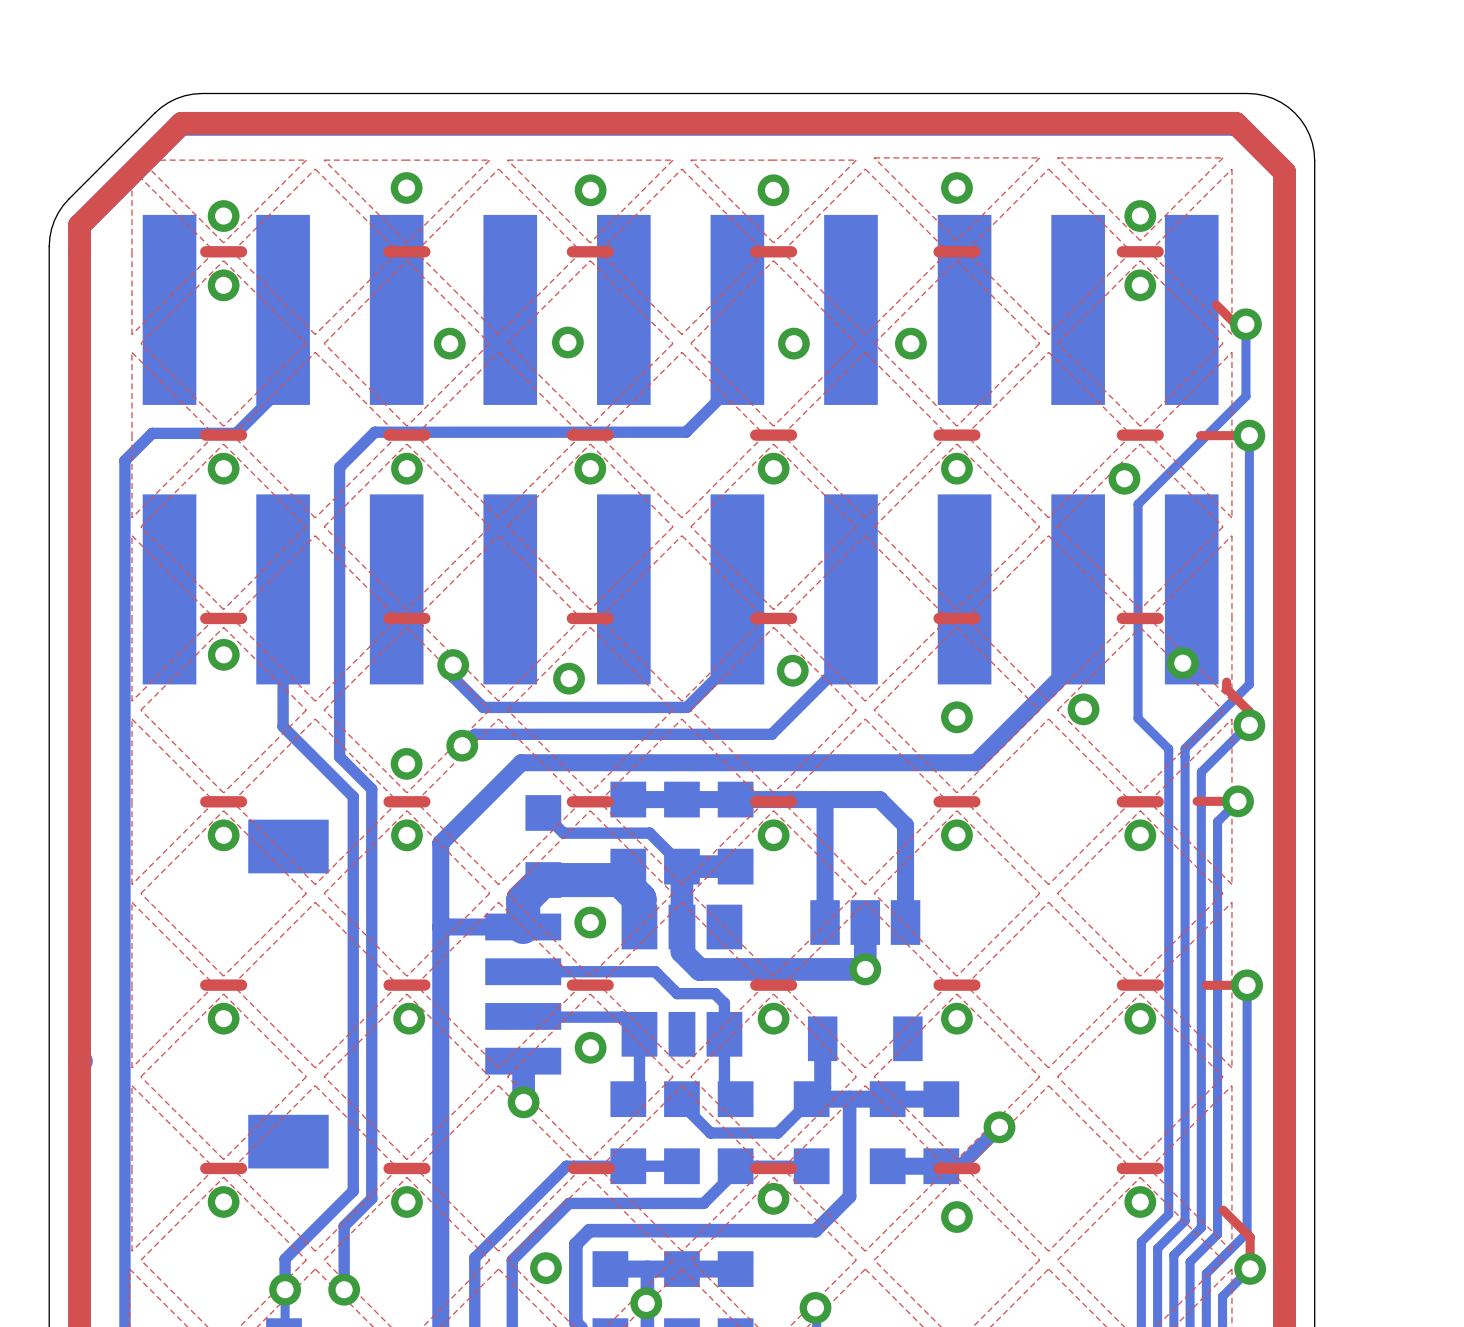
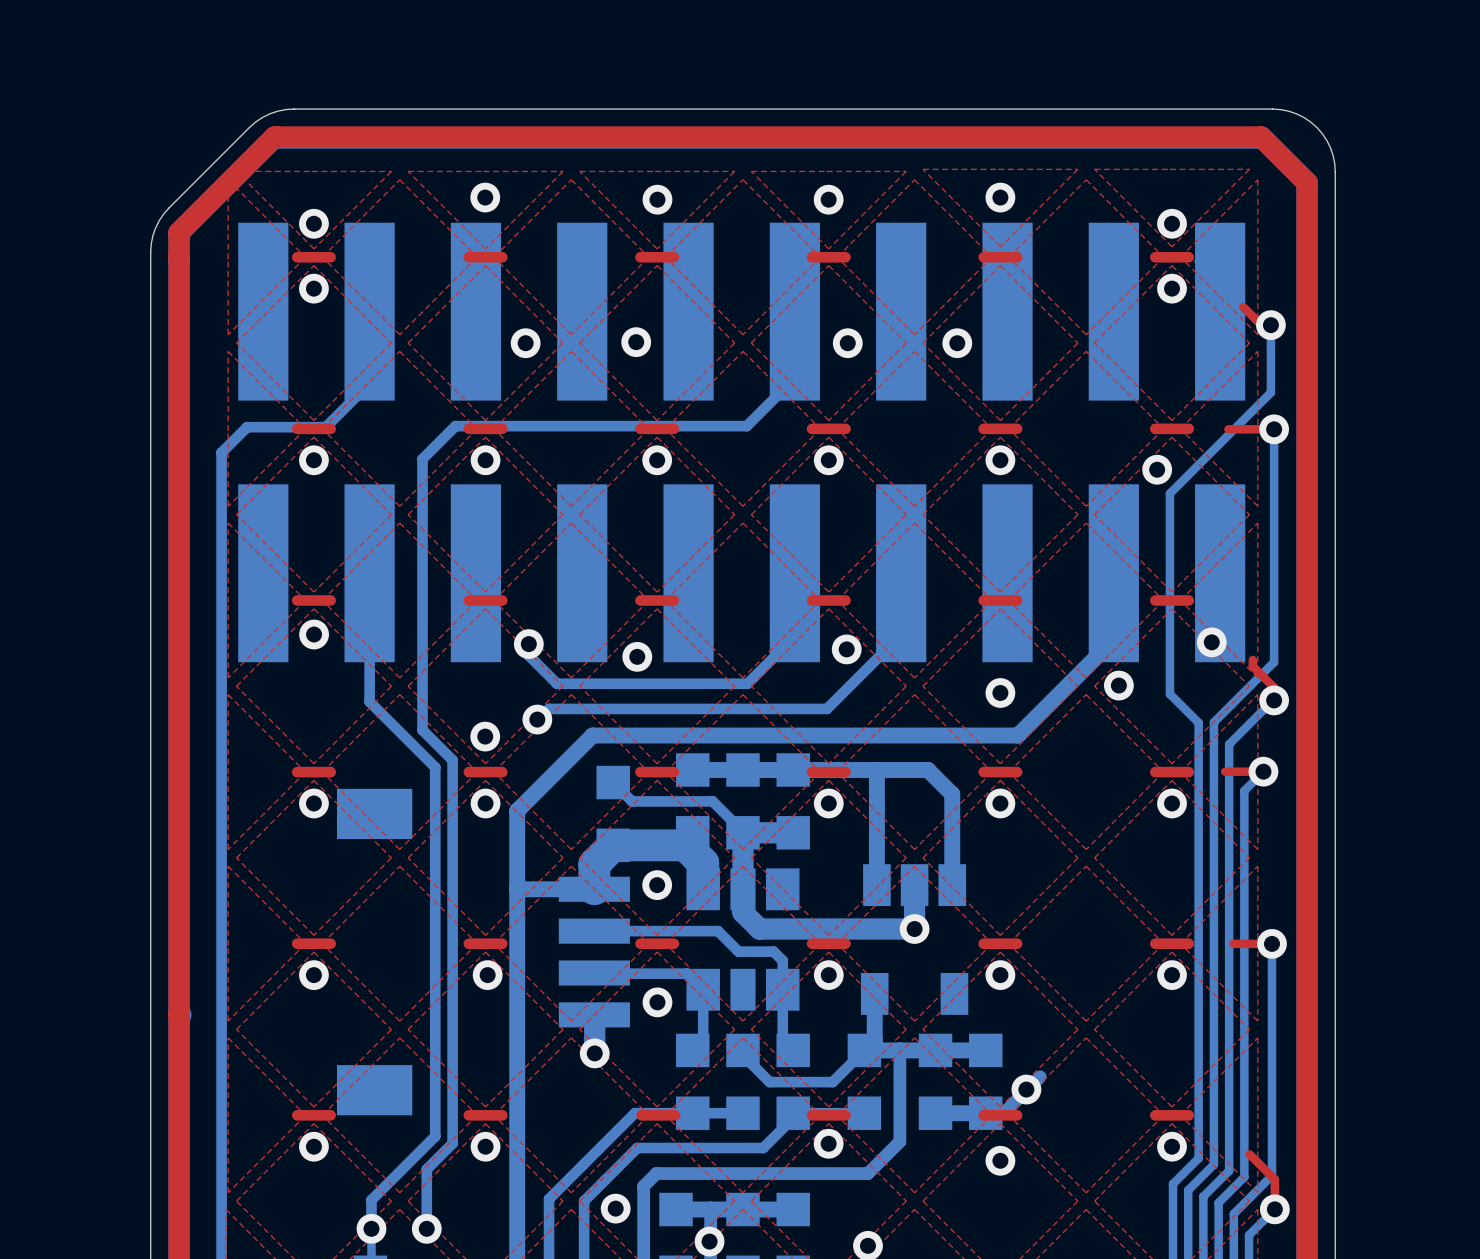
via position: (999, 1127) -> (1026, 1089)

